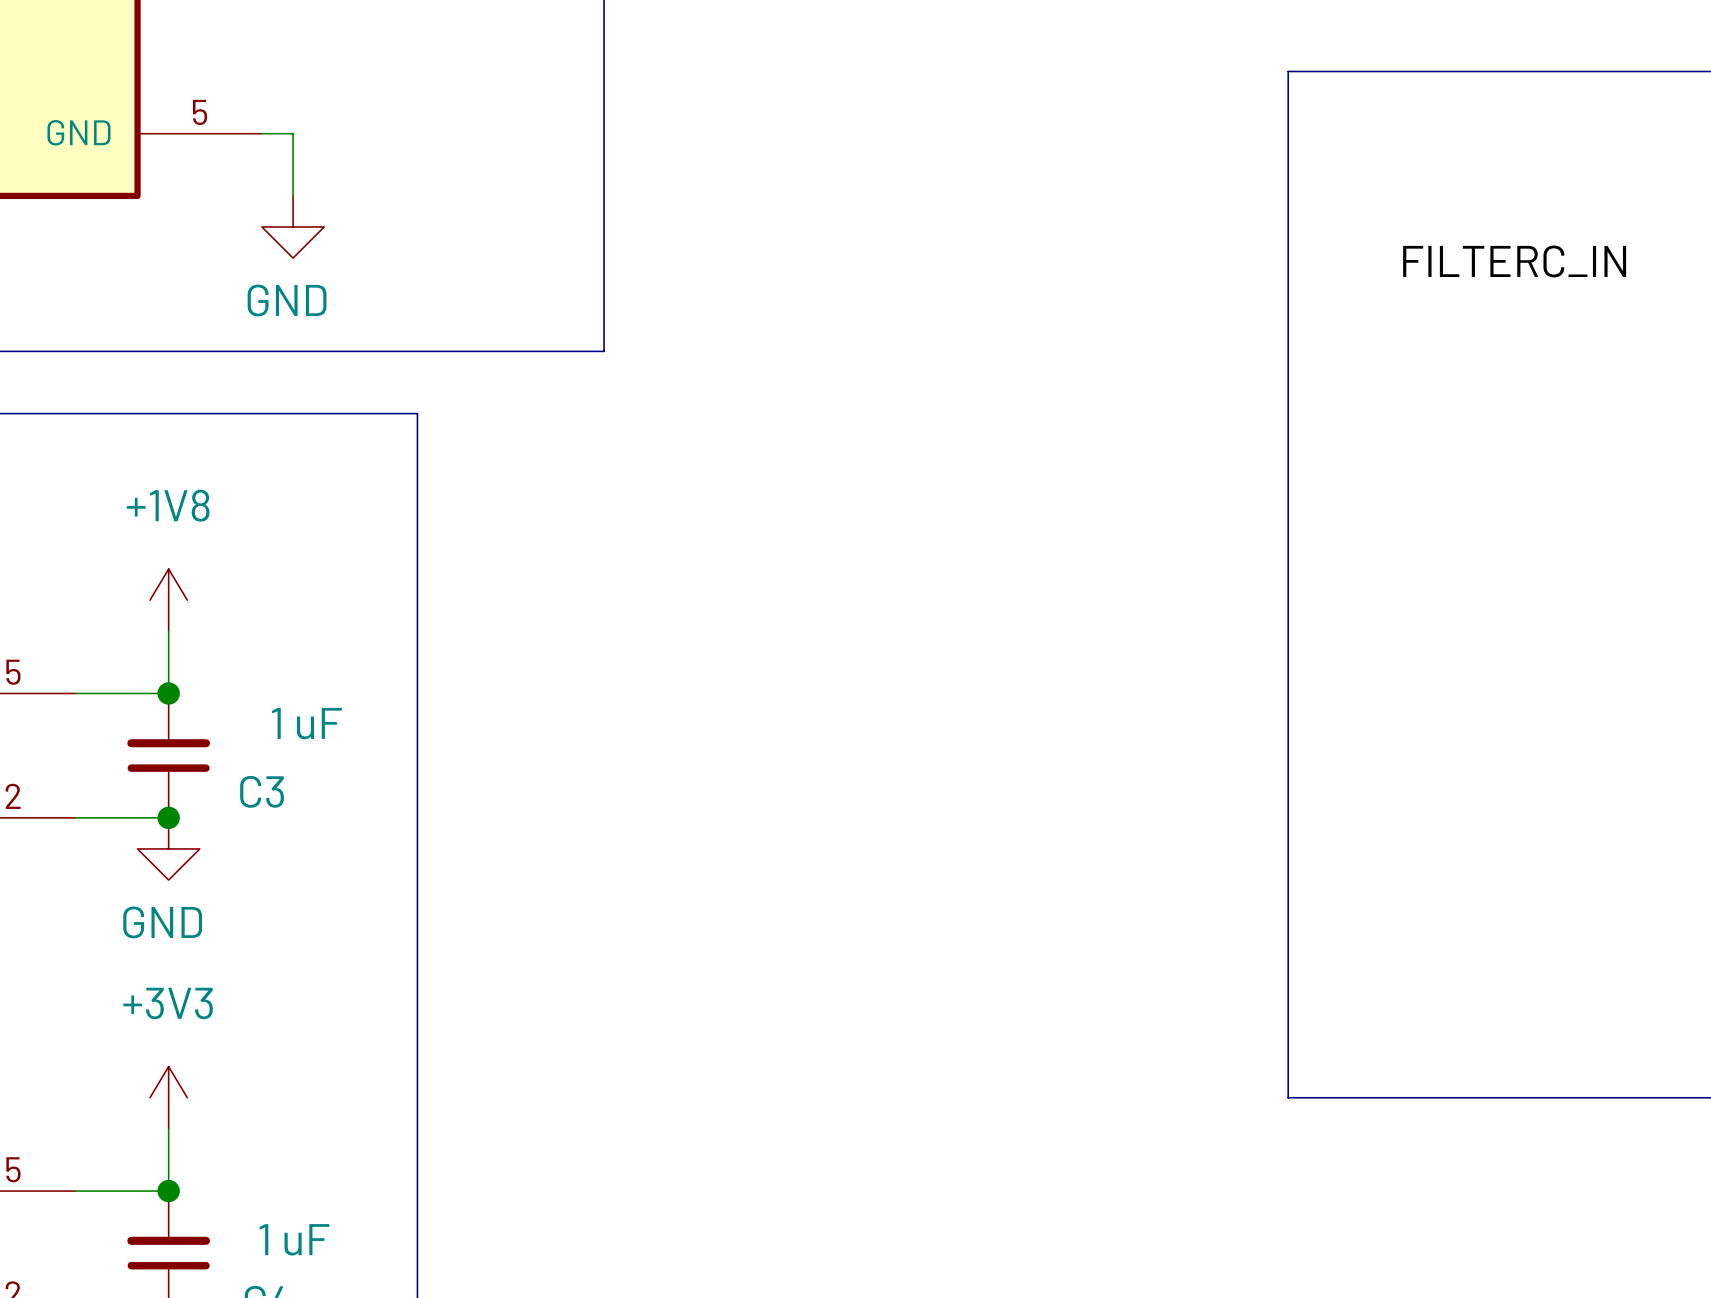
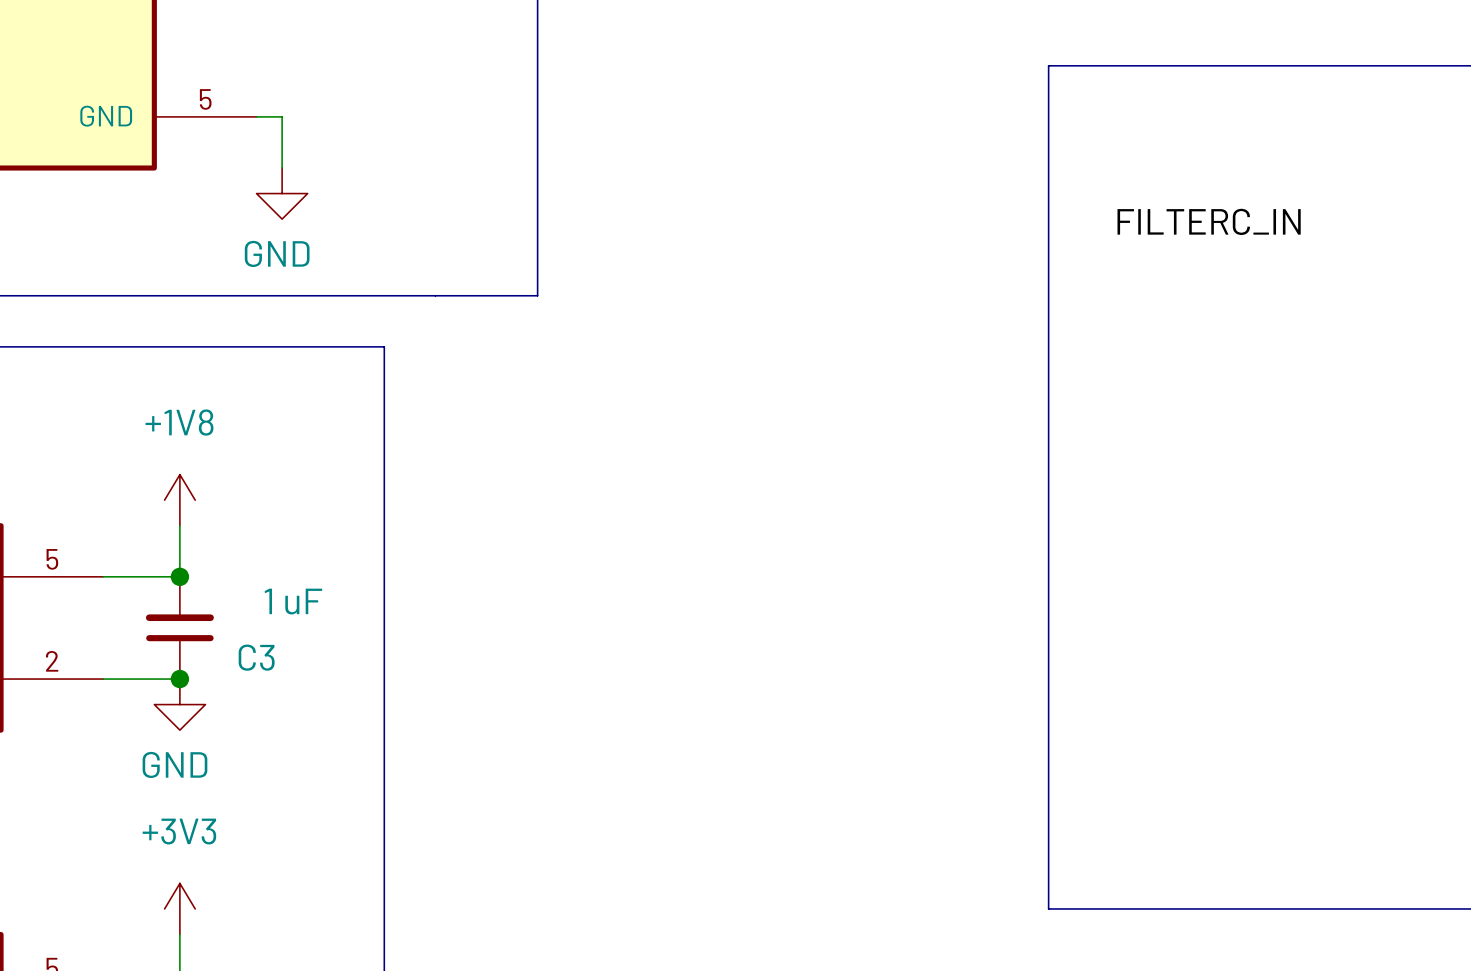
line: (1288, 71) (1288, 1097) -> (1099, 65) (1048, 65) (1048, 908) (1099, 908)
label position: FILTERC_IN (1514, 261) -> FILTERC_IN (1209, 221)

